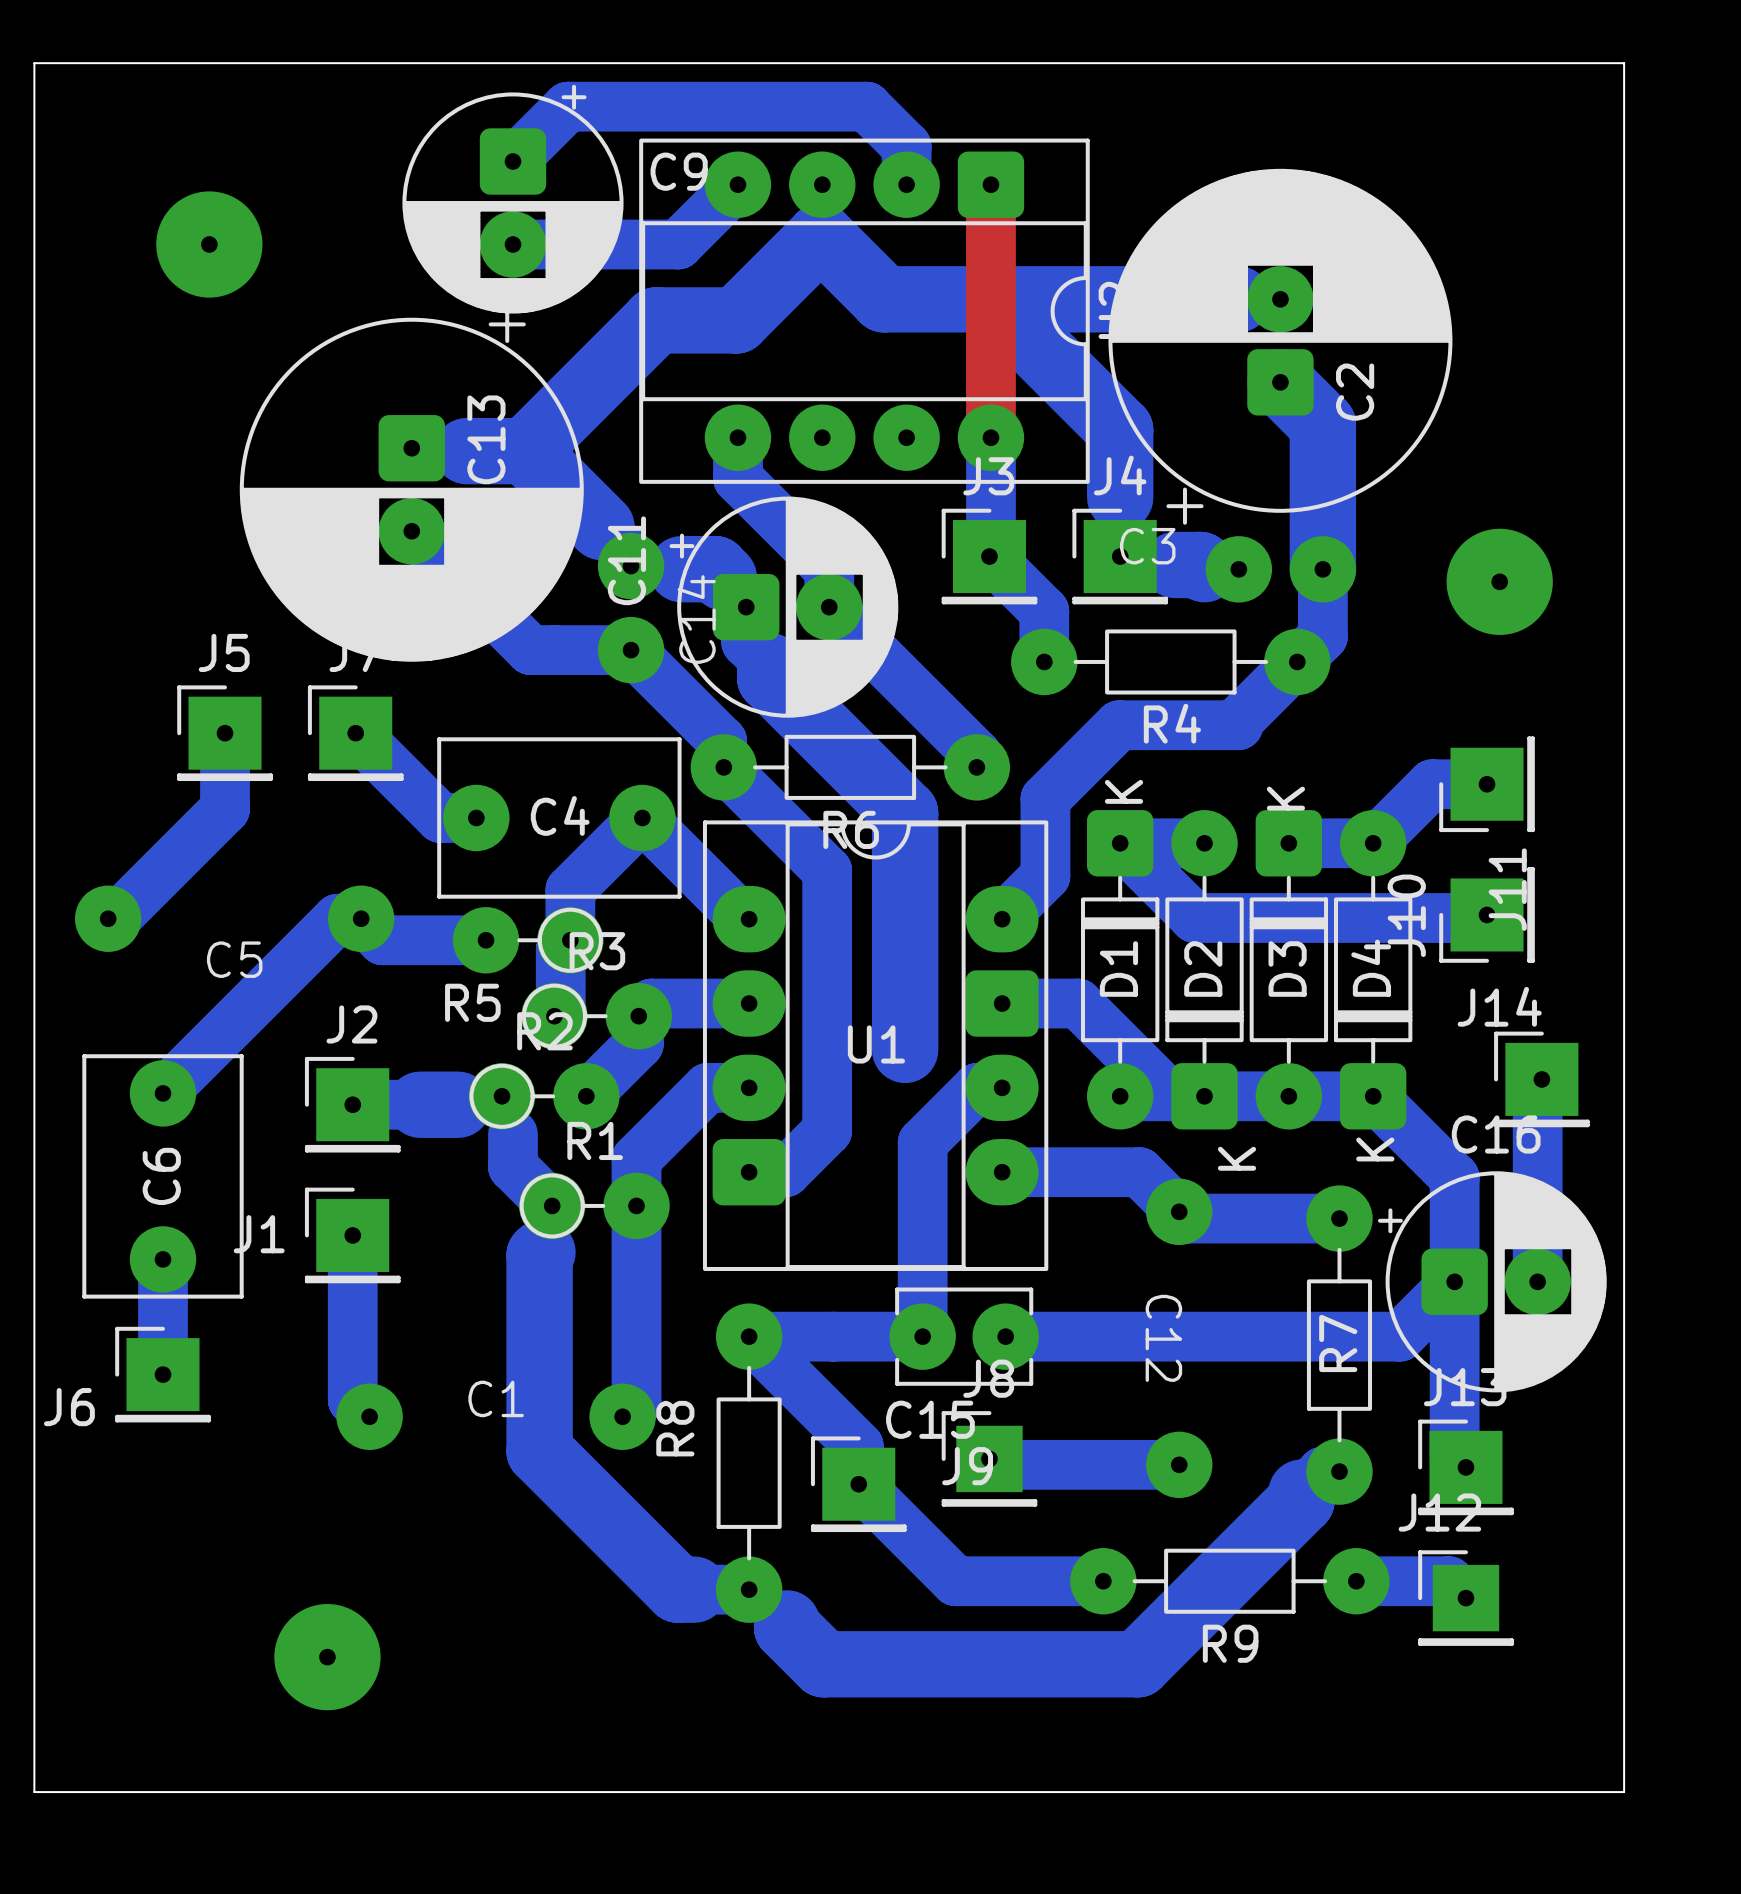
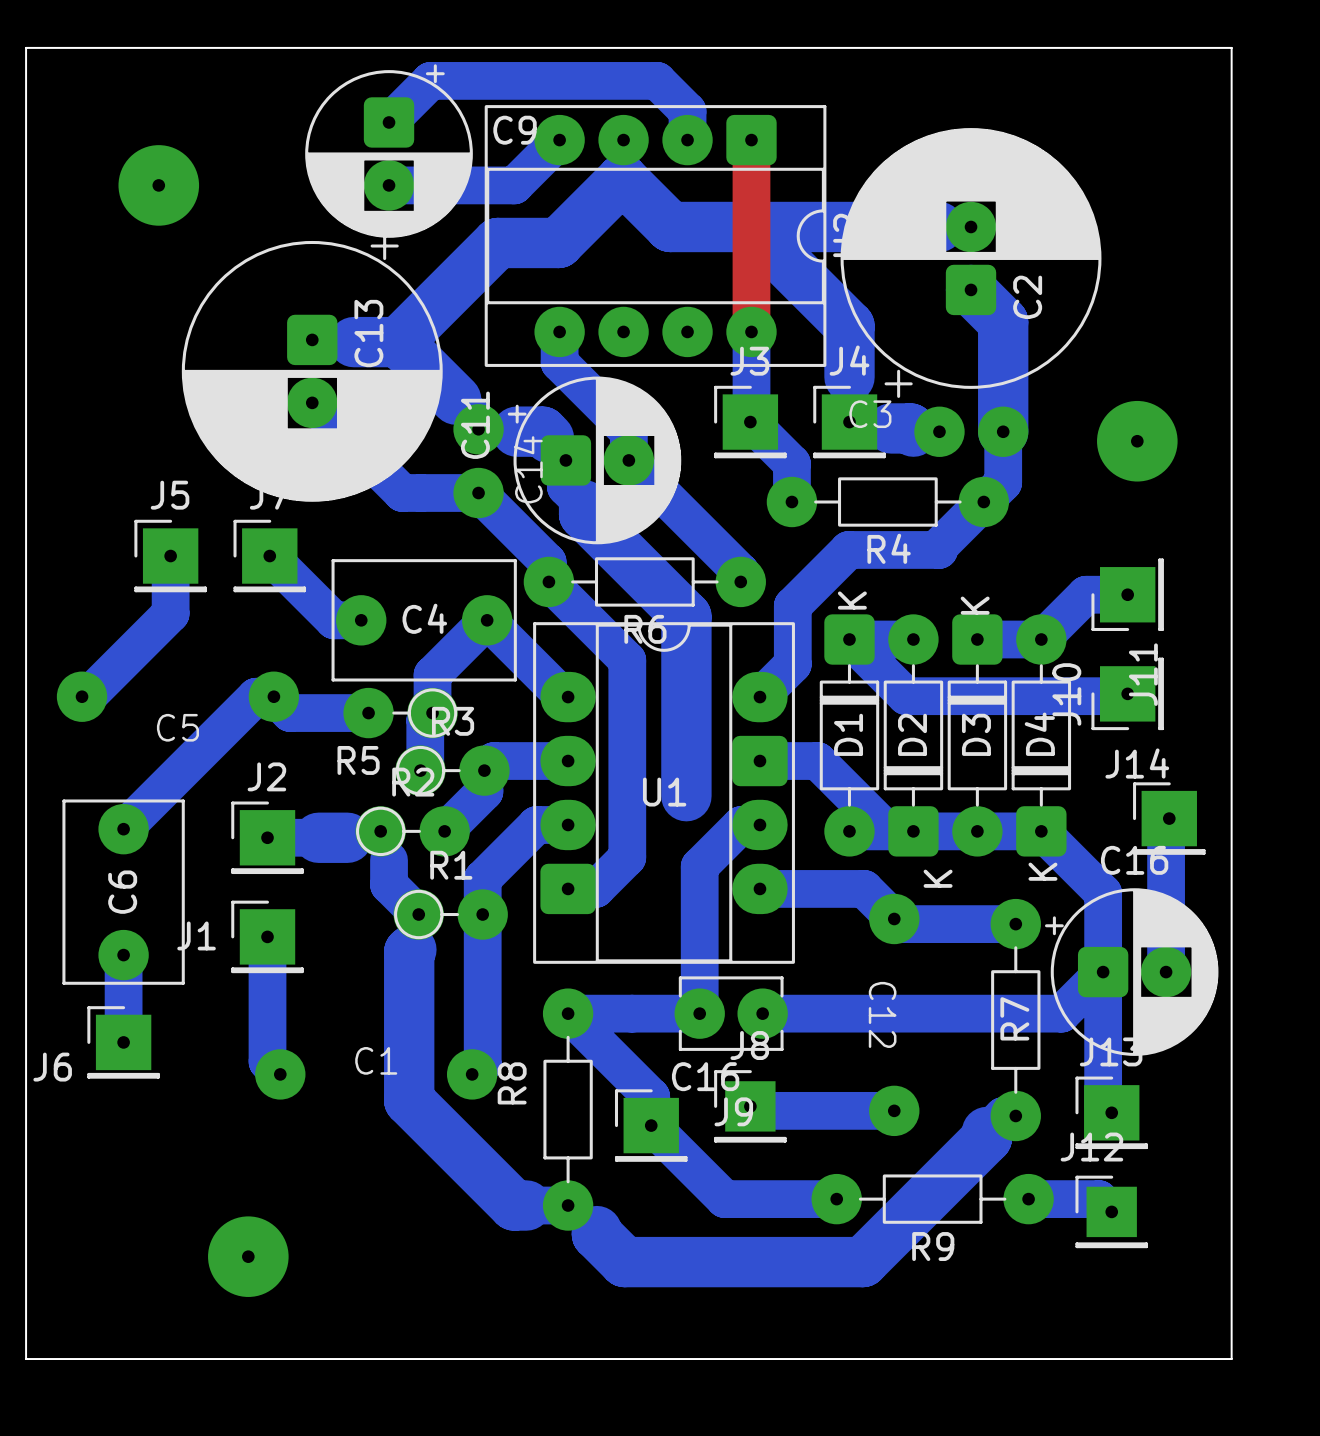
C15 name: C15 (930, 1419) -> C16 (705, 1076)

